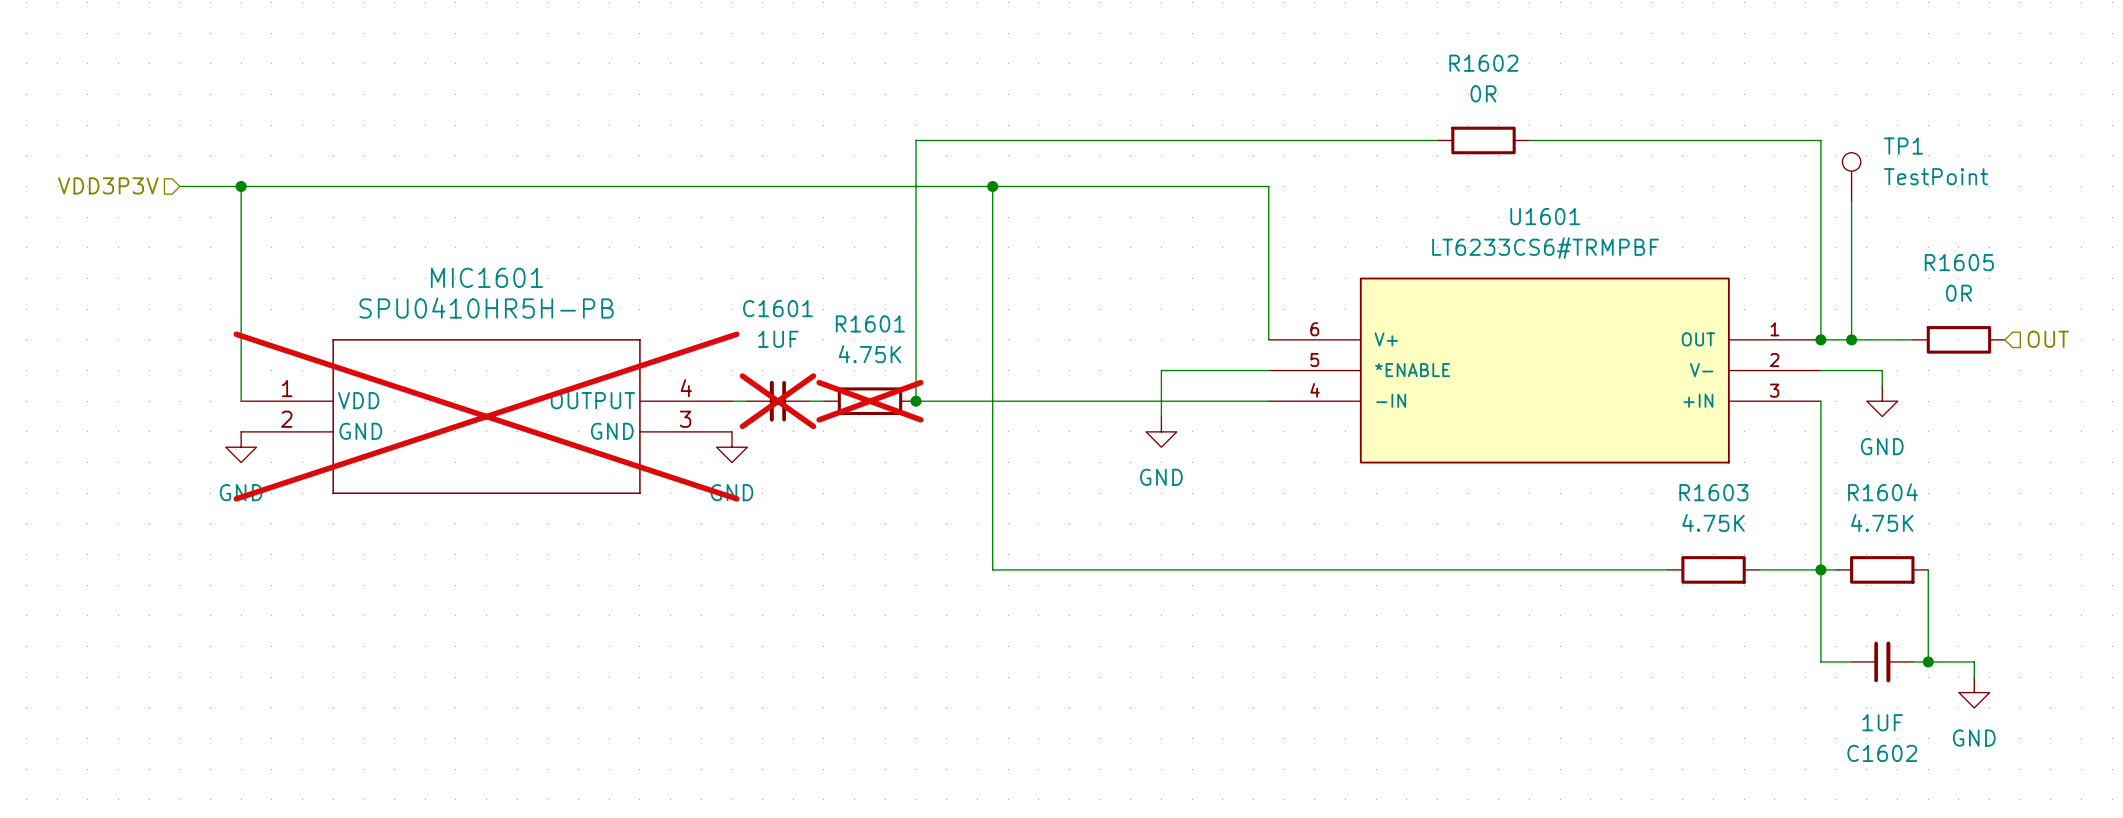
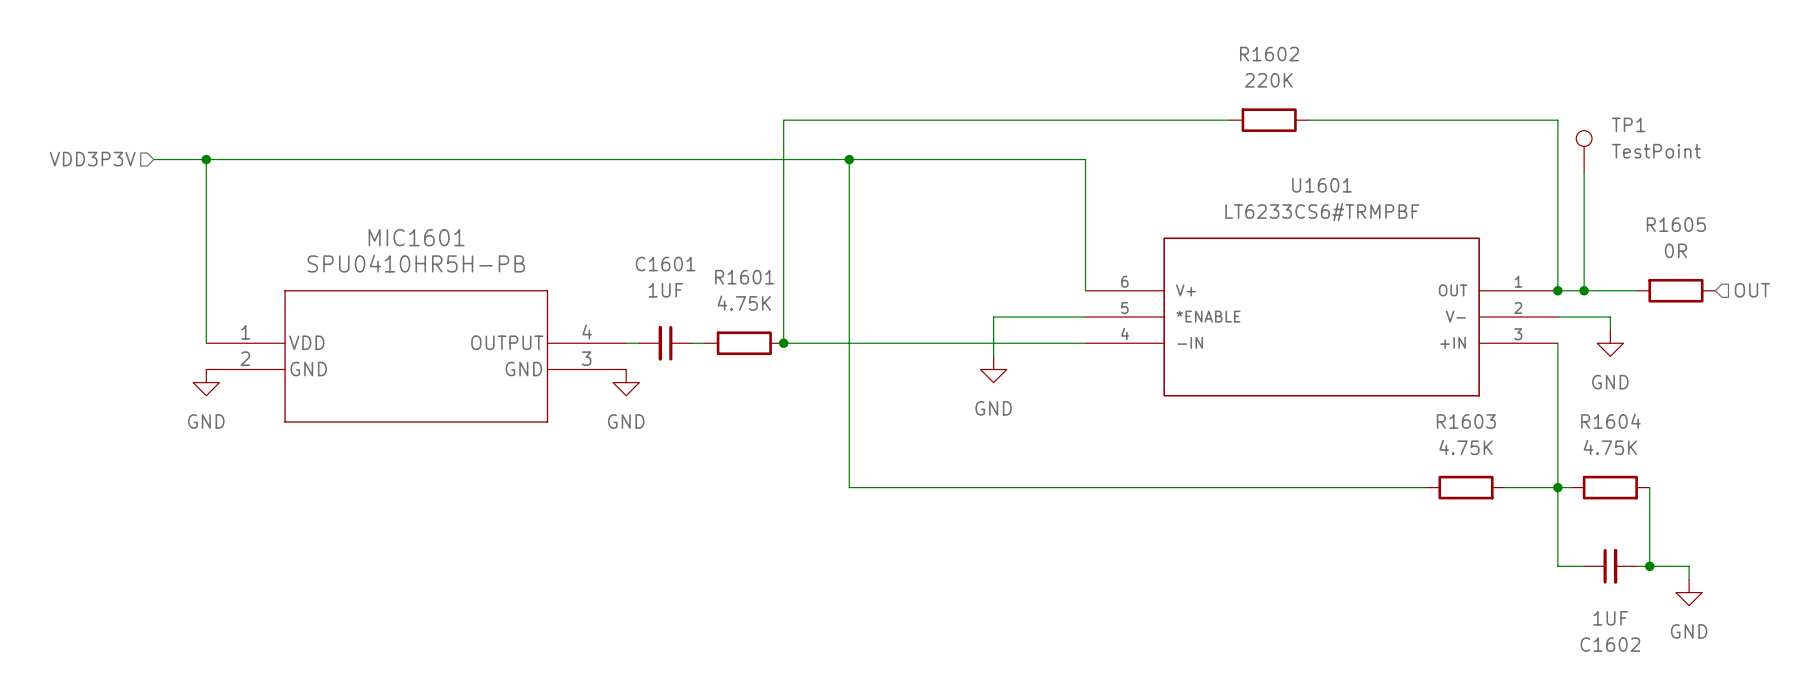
R1602 value: 0R (1483, 93) -> 220K (1268, 80)
C1601 do-not-place cross: (777, 401) -> none
R1601 do-not-place cross: (869, 401) -> none
MIC1601 do-not-place cross: (486, 416) -> none

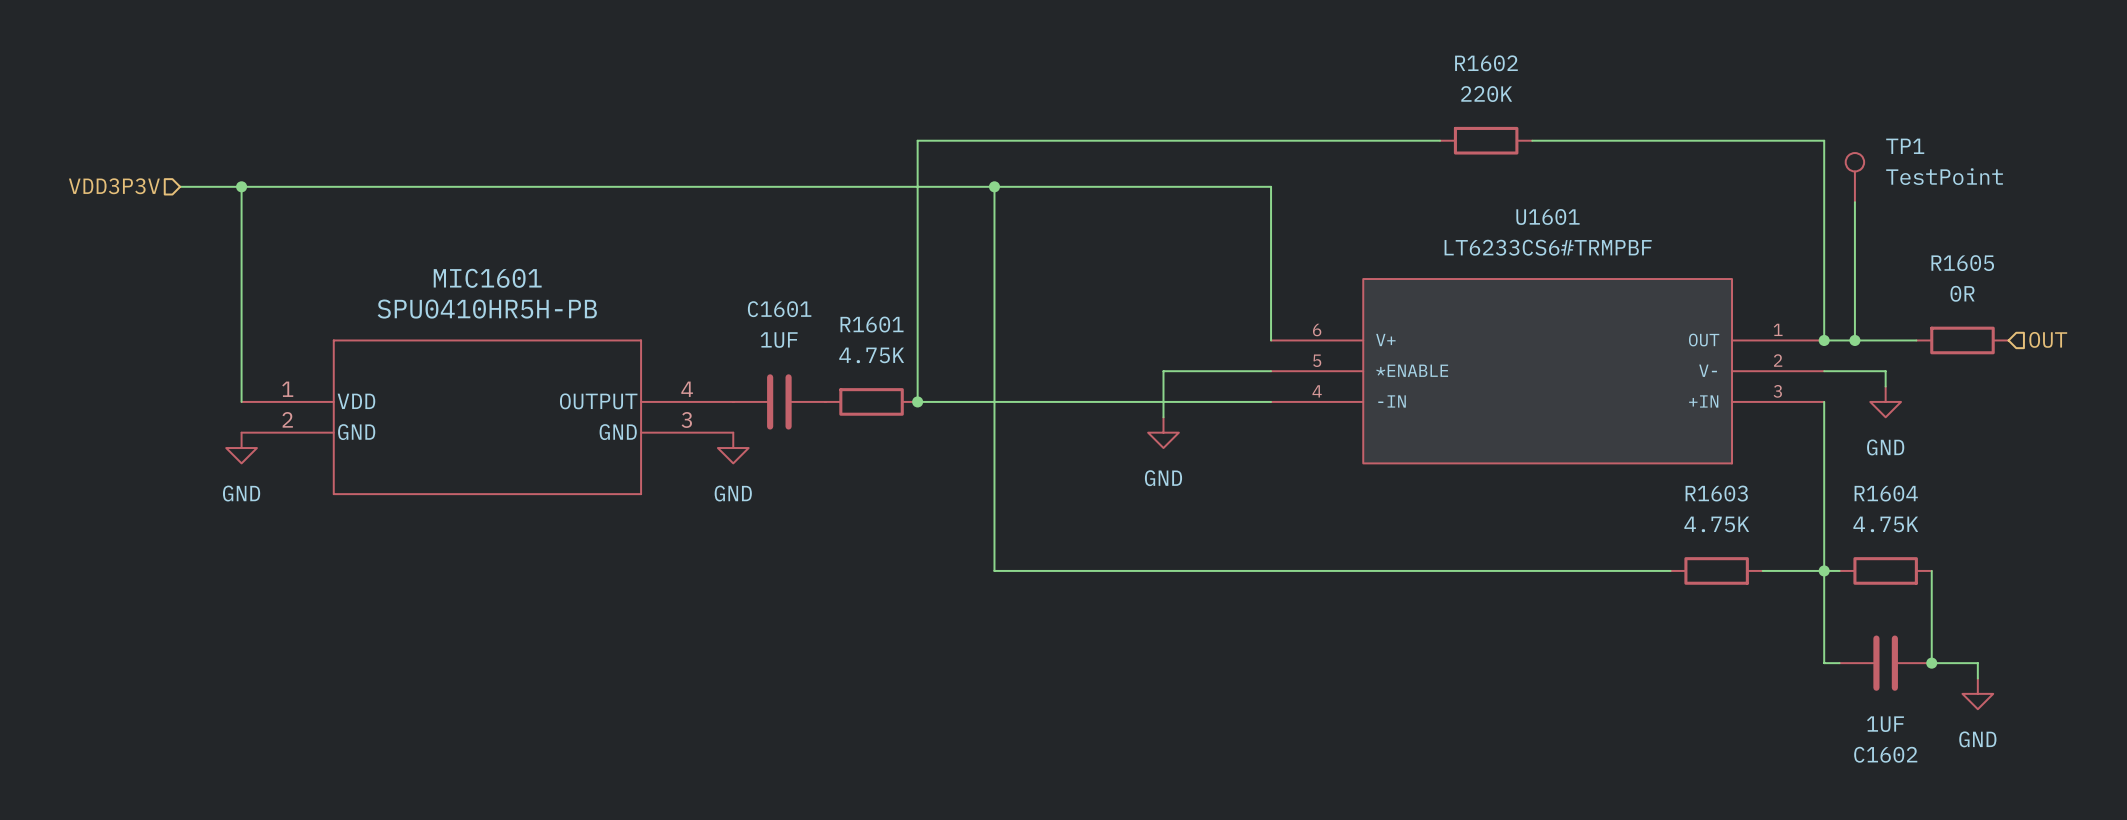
C1601 symbol: [639, 325, 692, 361] -> [733, 374, 826, 430]
C1602 symbol: [1584, 548, 1637, 584] -> [1839, 635, 1932, 691]

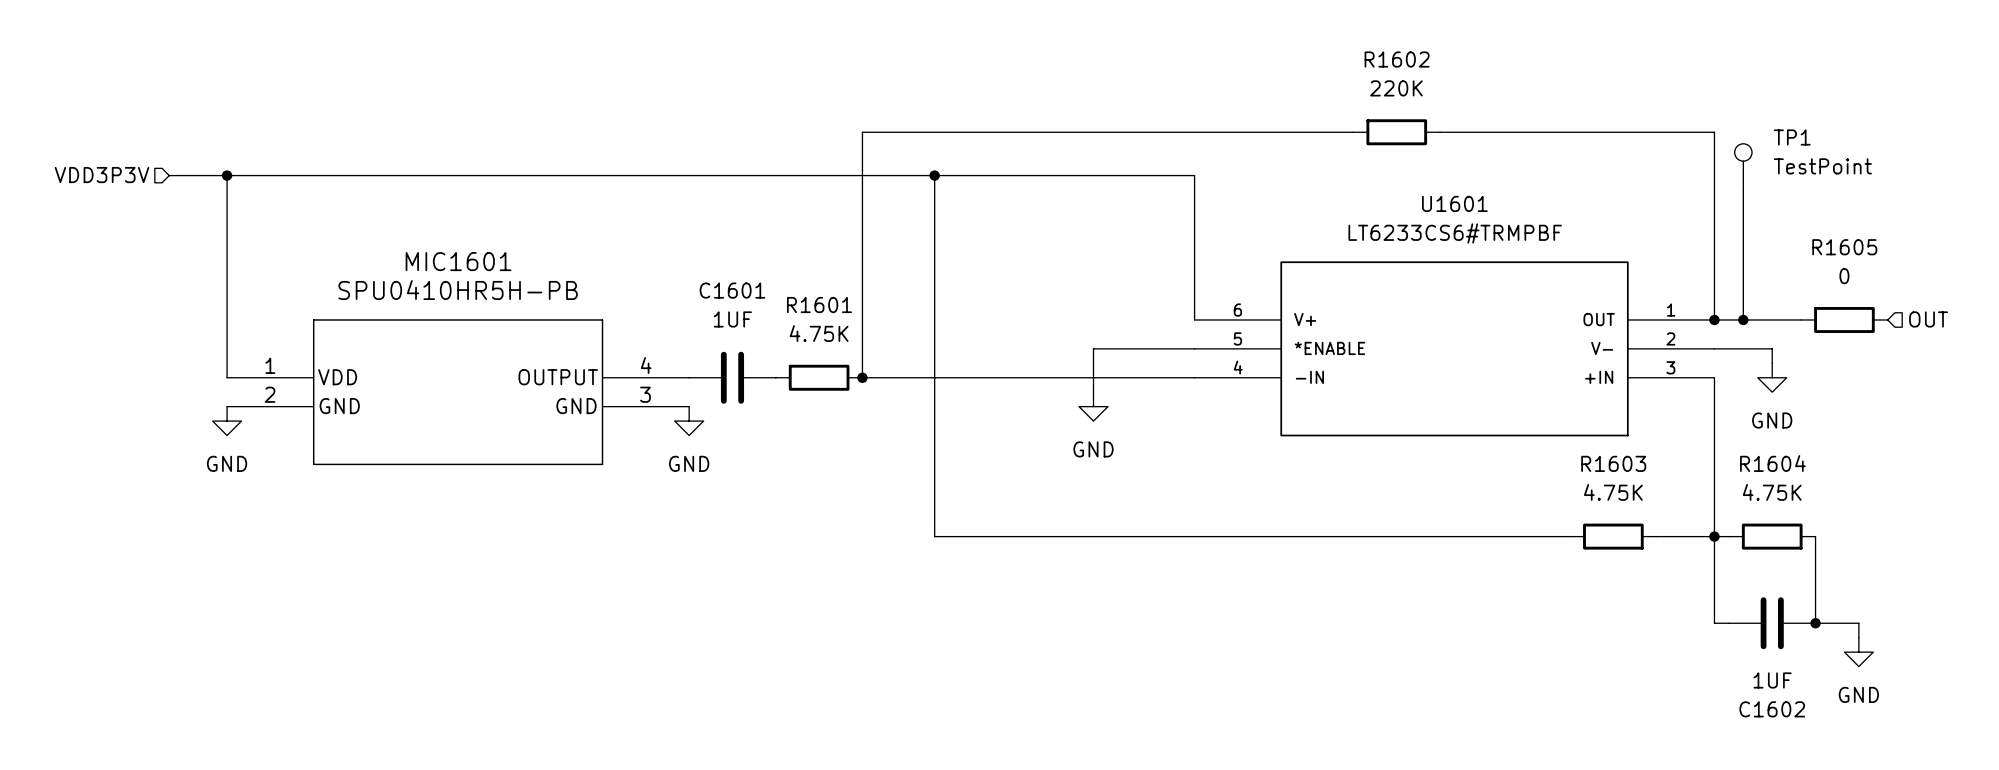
R1605 value: 0R (1962, 293) -> 0 (1844, 276)

